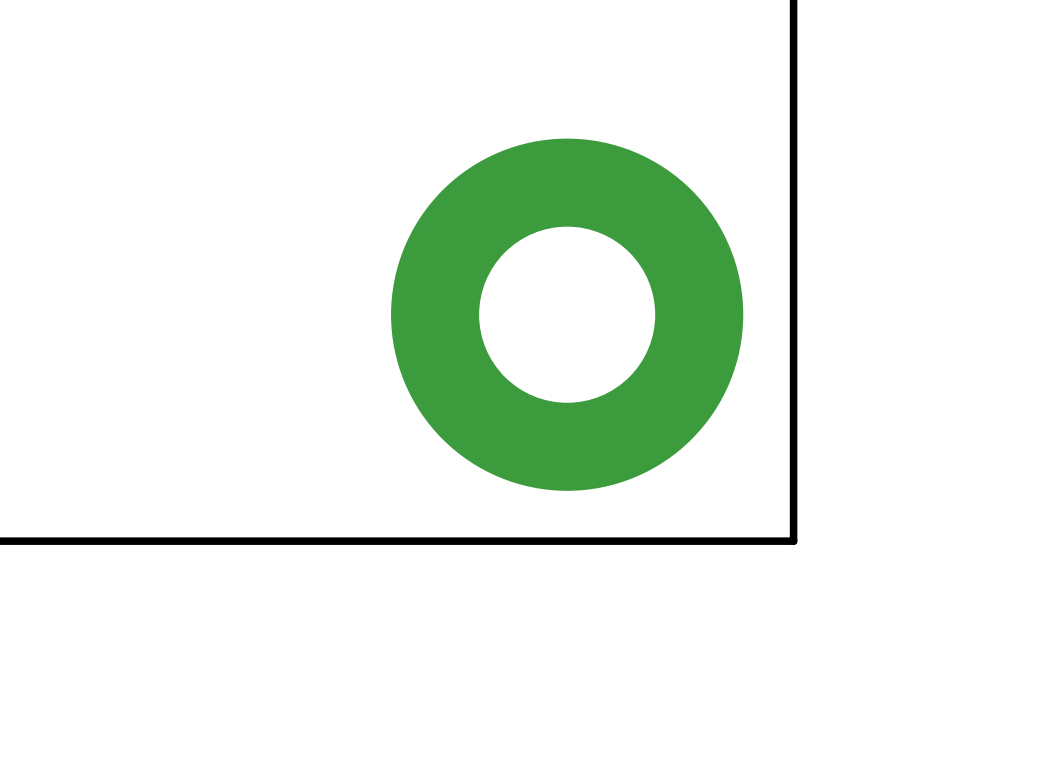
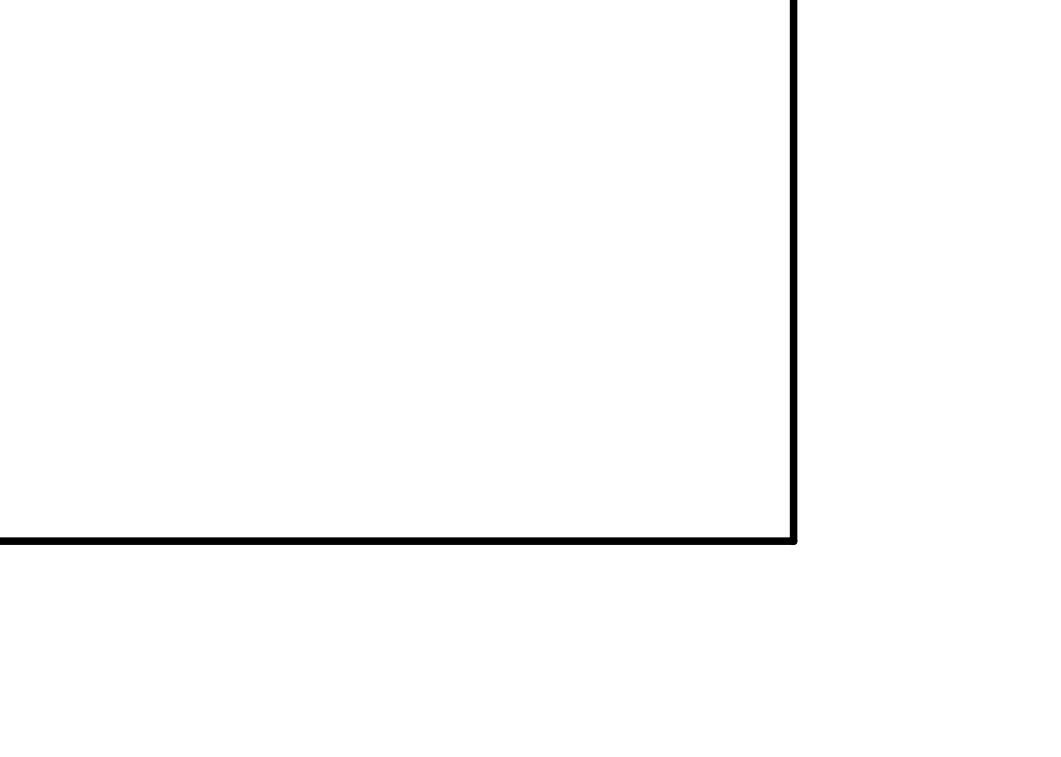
part: (567, 314) -> none

